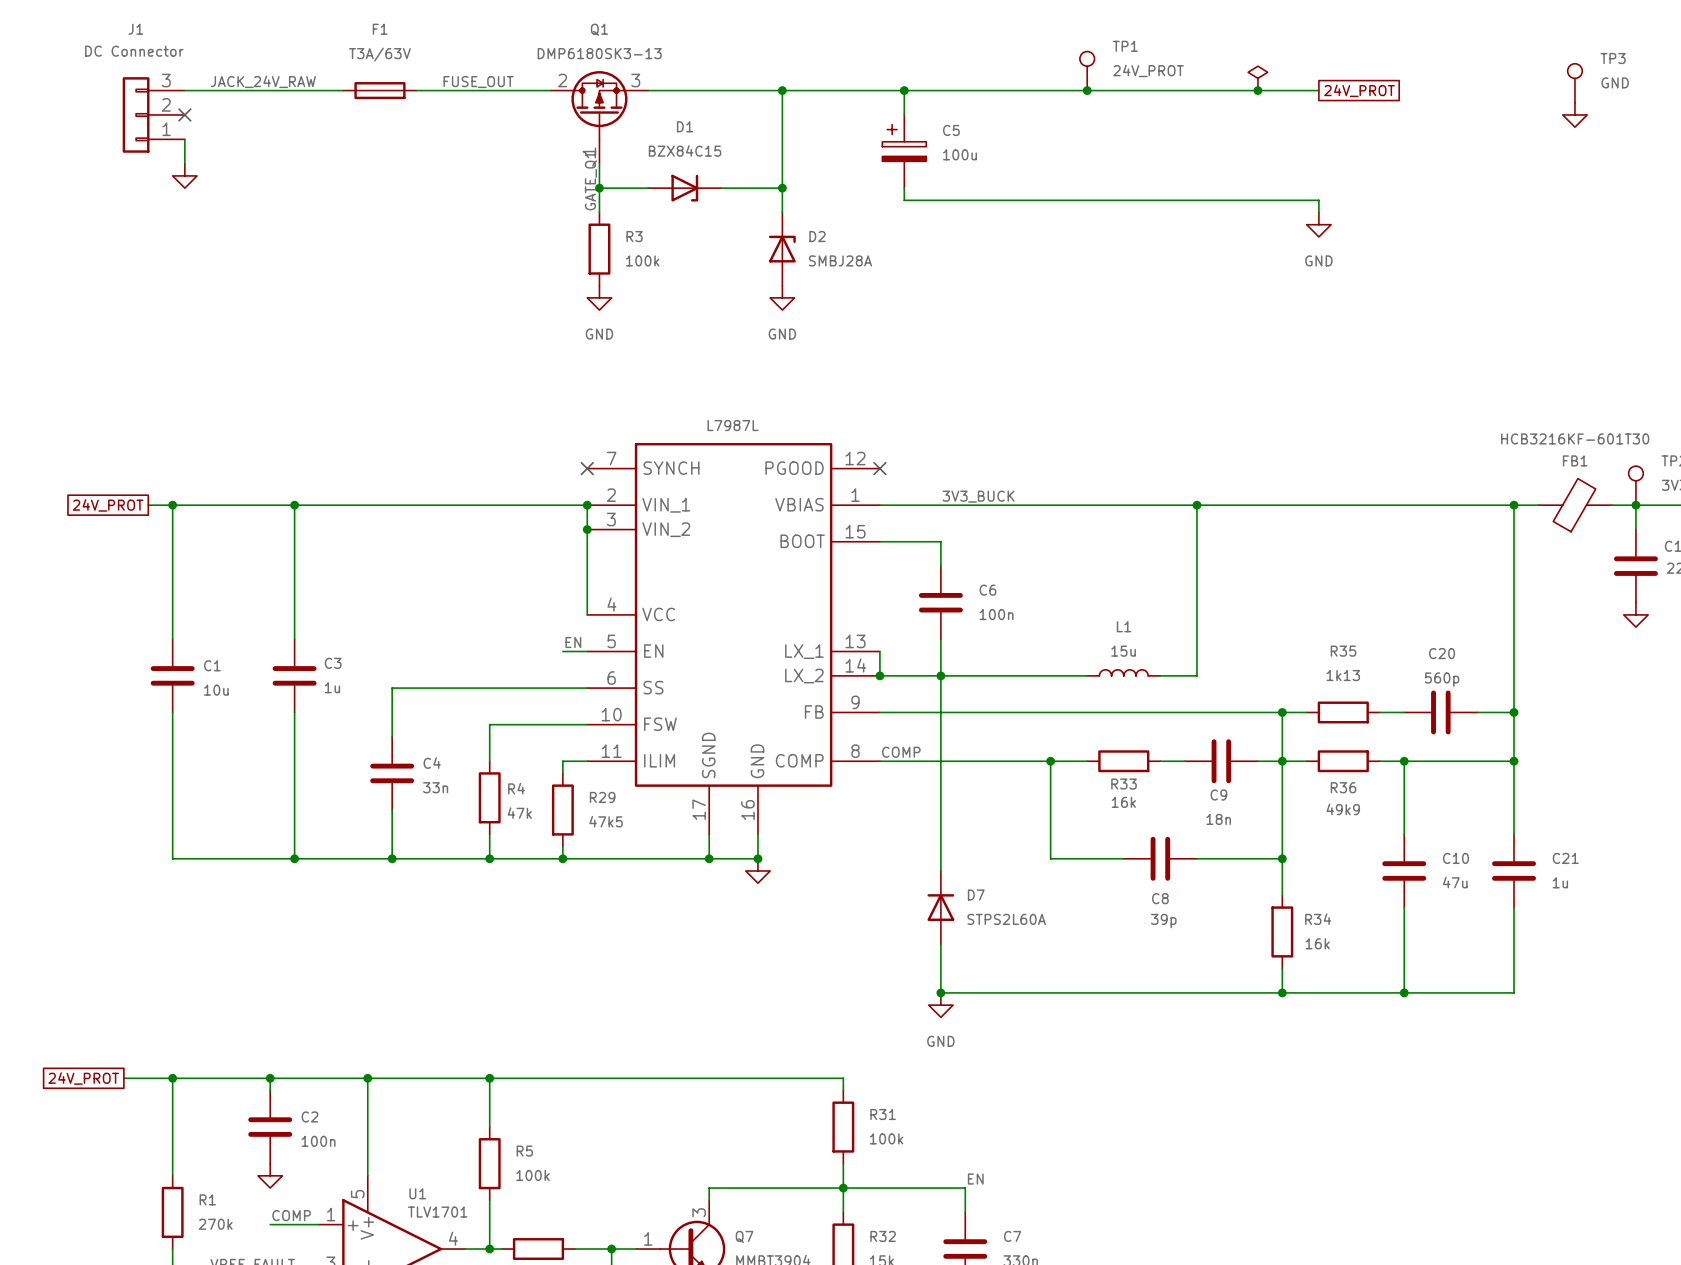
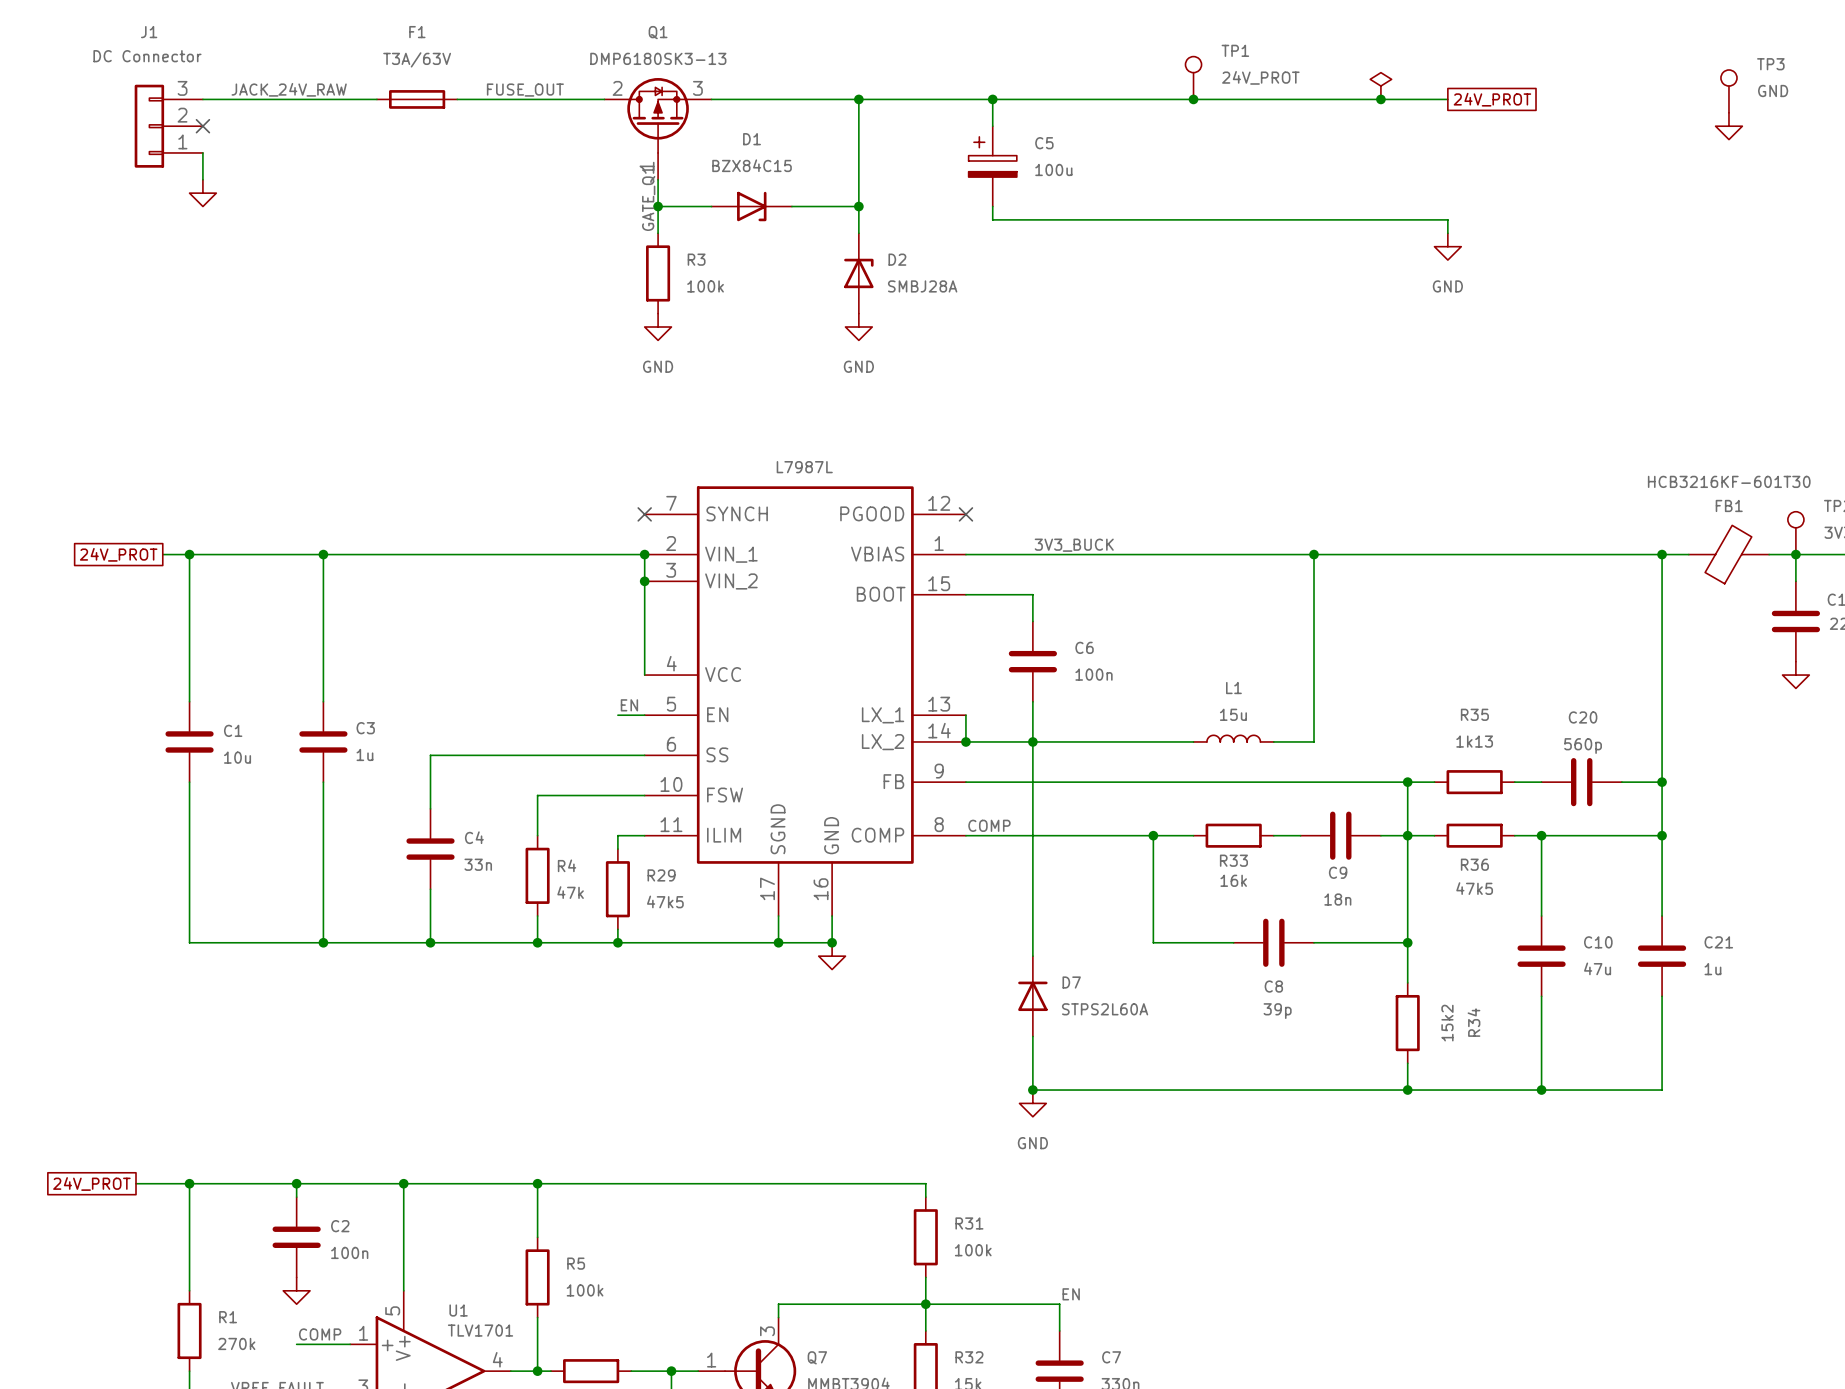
R36 value: 49k9 (1343, 809) -> 47k5 (1474, 888)
R34 name rotation: 0° (1318, 919) -> 90° counterclockwise (1473, 1022)
R34 value: 16k (1317, 943) -> 15k2 (1447, 1023)

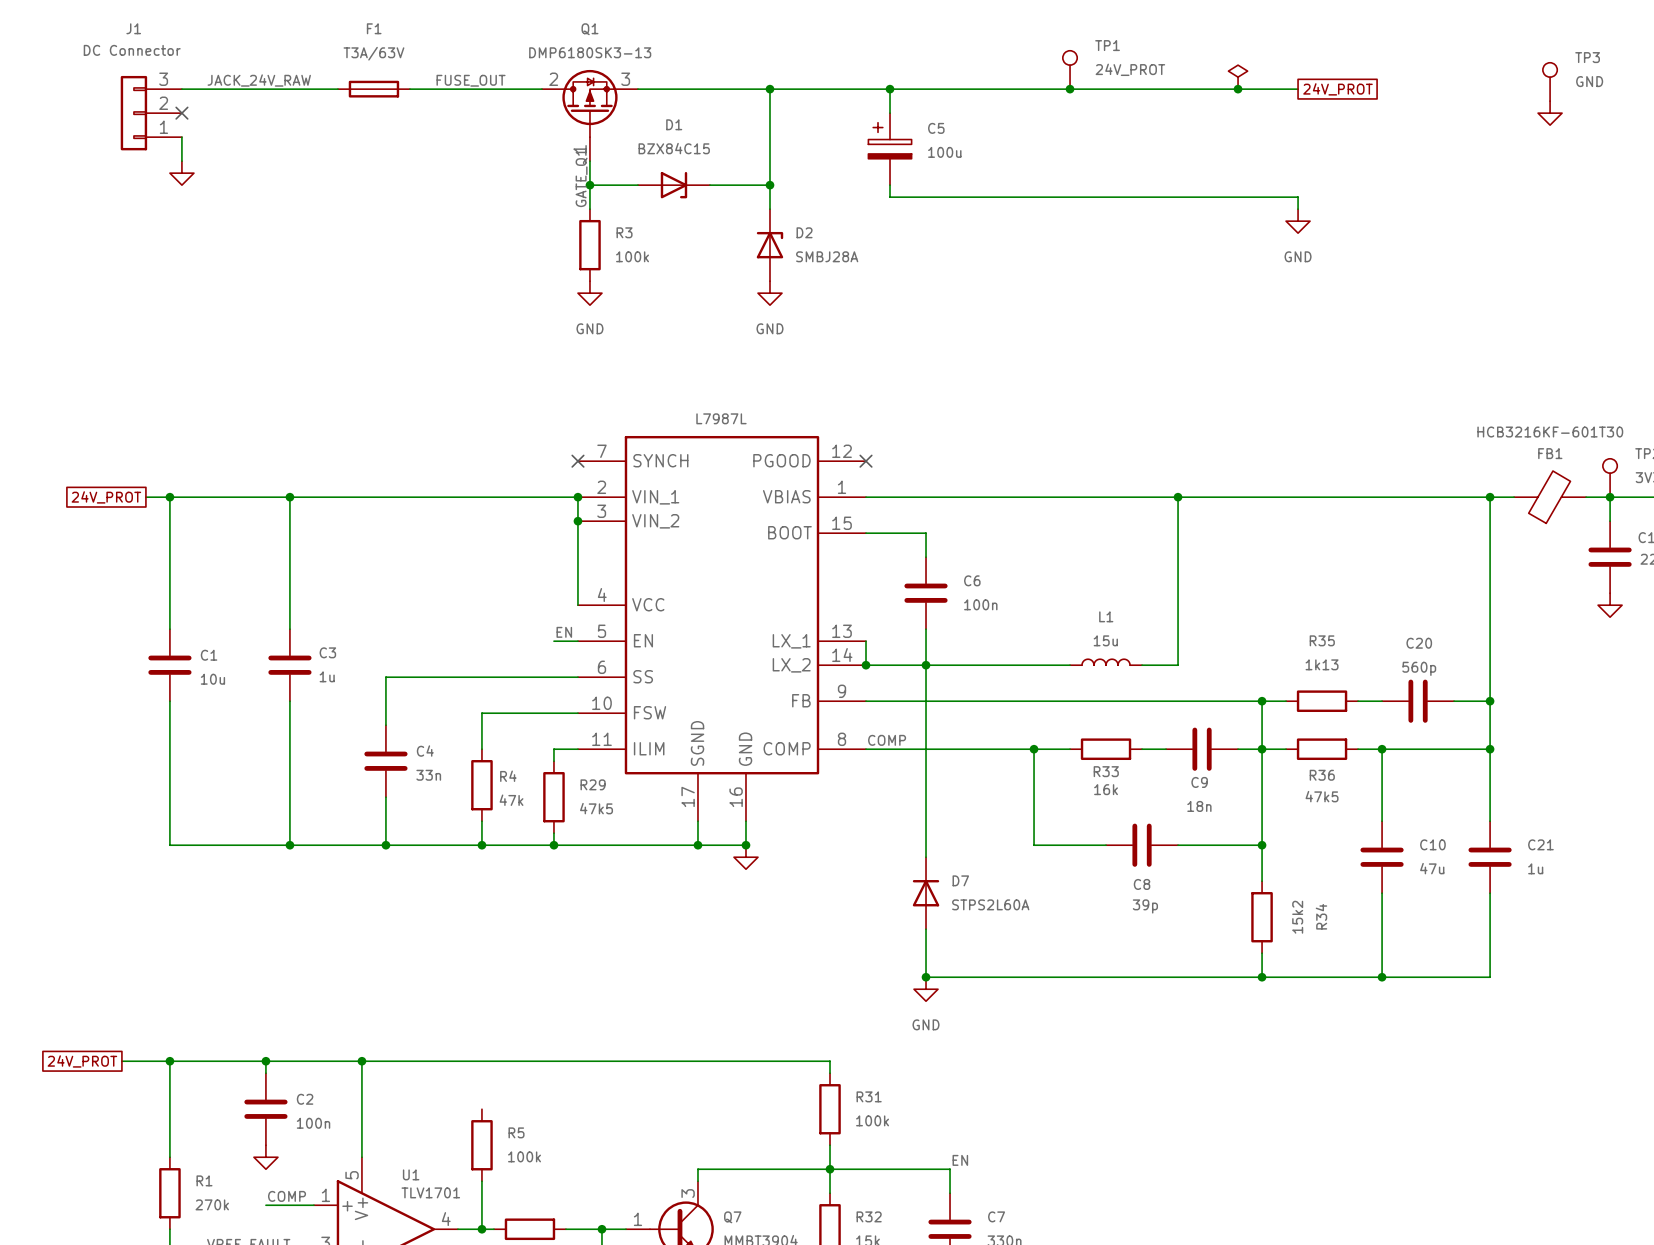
label: 3V3_BUCK (1074, 545) -> none
wire: (537, 1183) (537, 1237) -> none
junction: (537, 1183) -> none

